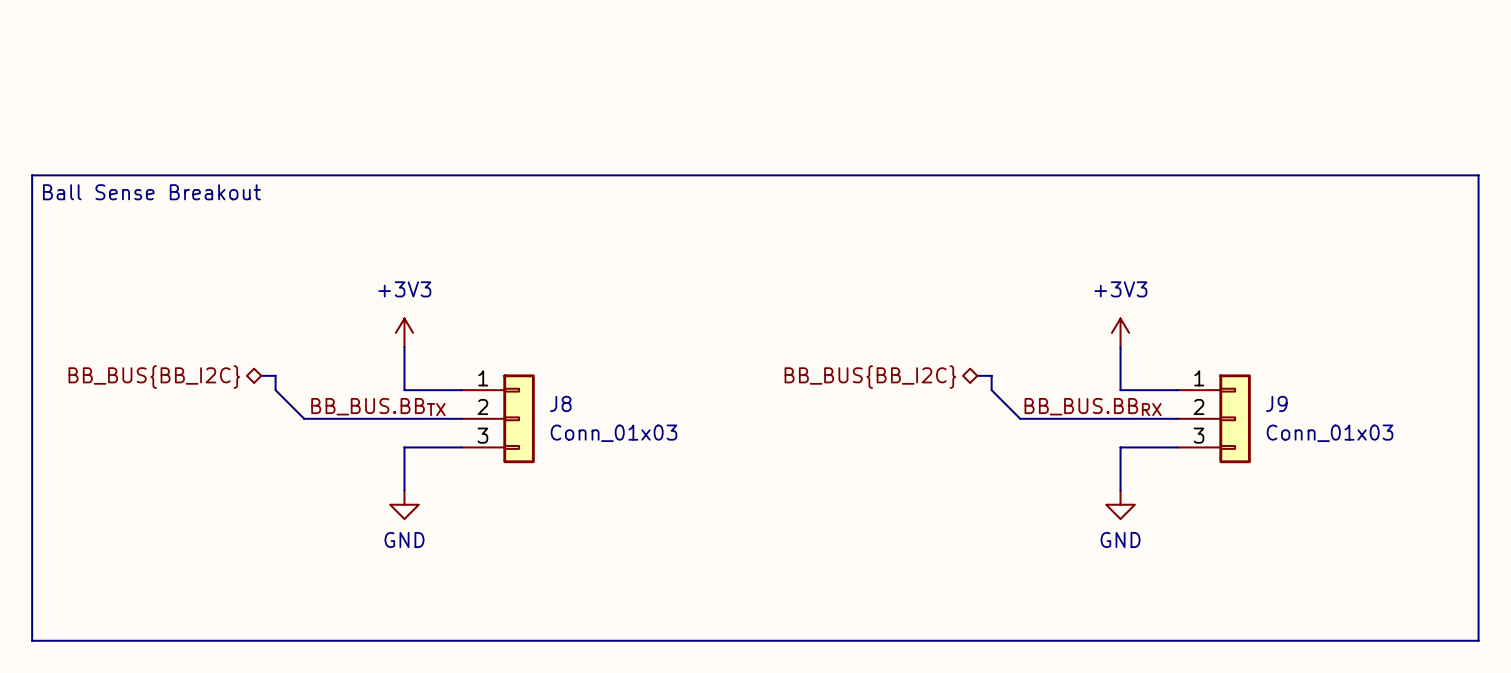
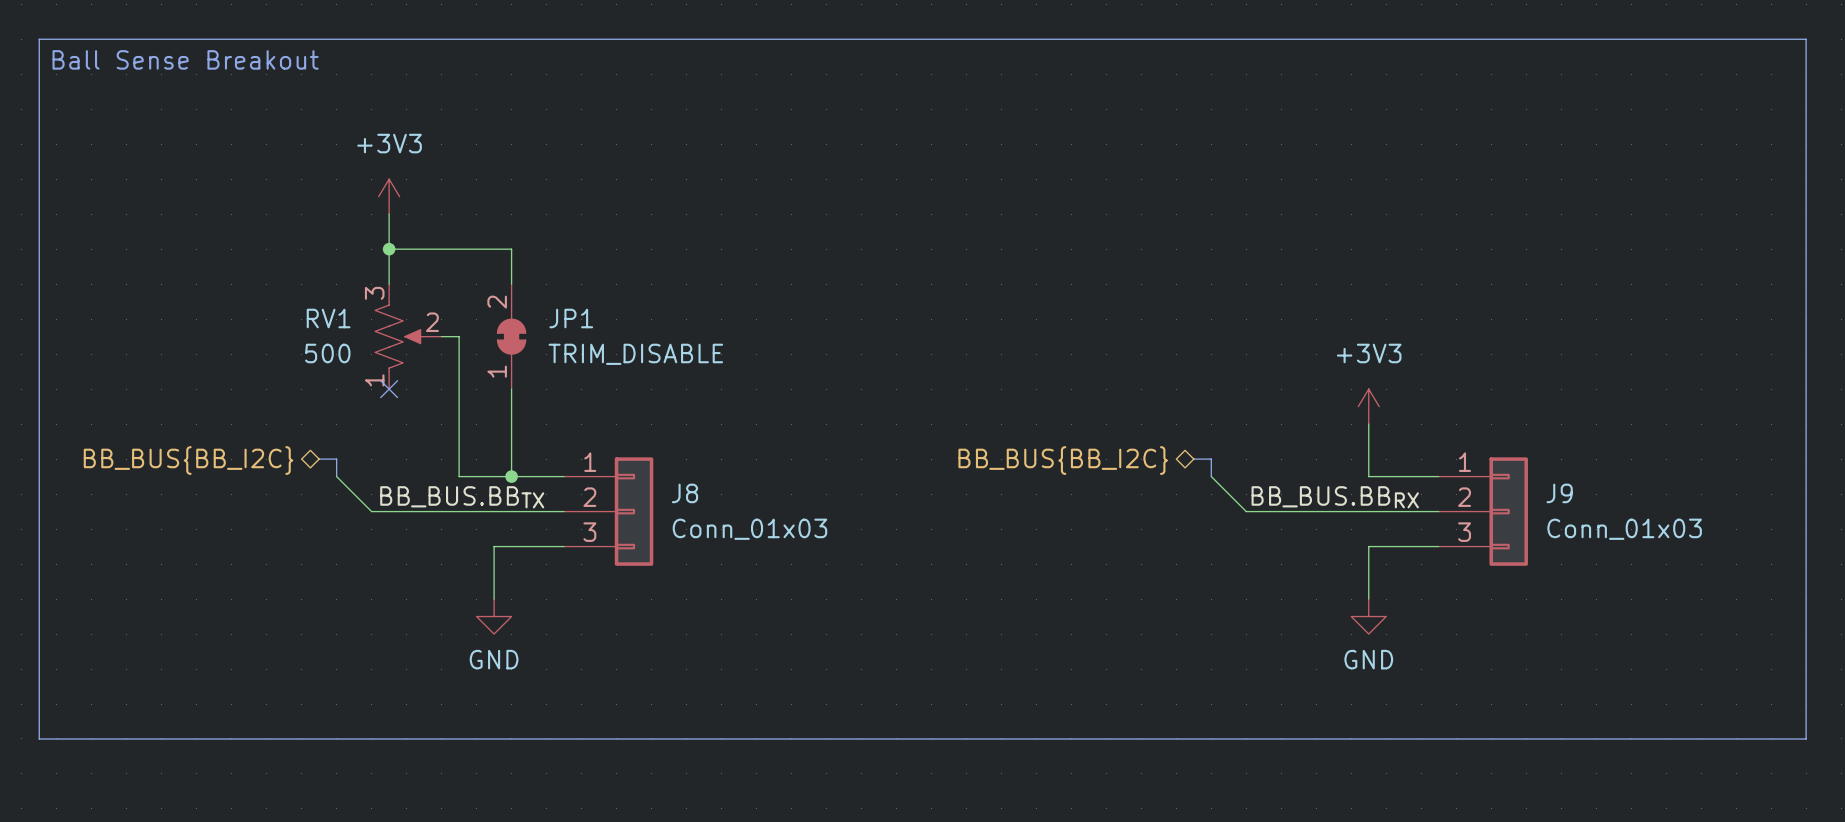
line: (32, 175) (1478, 175) -> (39, 214) (39, 39) (1806, 39) (1806, 214)
wire: none -> (389, 214) (389, 284)
text position: Ball Sense Breakout (151, 192) -> Ball Sense Breakout (185, 59)
wire: none -> (389, 249) (511, 249) (511, 284)
junction: none -> (389, 249)
RV1: none -> 500 (408, 336)
JP1: none -> TRIM_DISABLE (511, 336)
no-connect mark: none -> (389, 389)
wire: none -> (511, 389) (511, 476)
power symbol position: +3V3 (404, 332) -> +3V3 (389, 196)
wire: (404, 347) (404, 390) -> (441, 336) (459, 336) (459, 476) (494, 476)
junction: none -> (511, 476)
line: (32, 604) (32, 640) (1478, 640) (1478, 604) -> (39, 738) (1806, 738)

